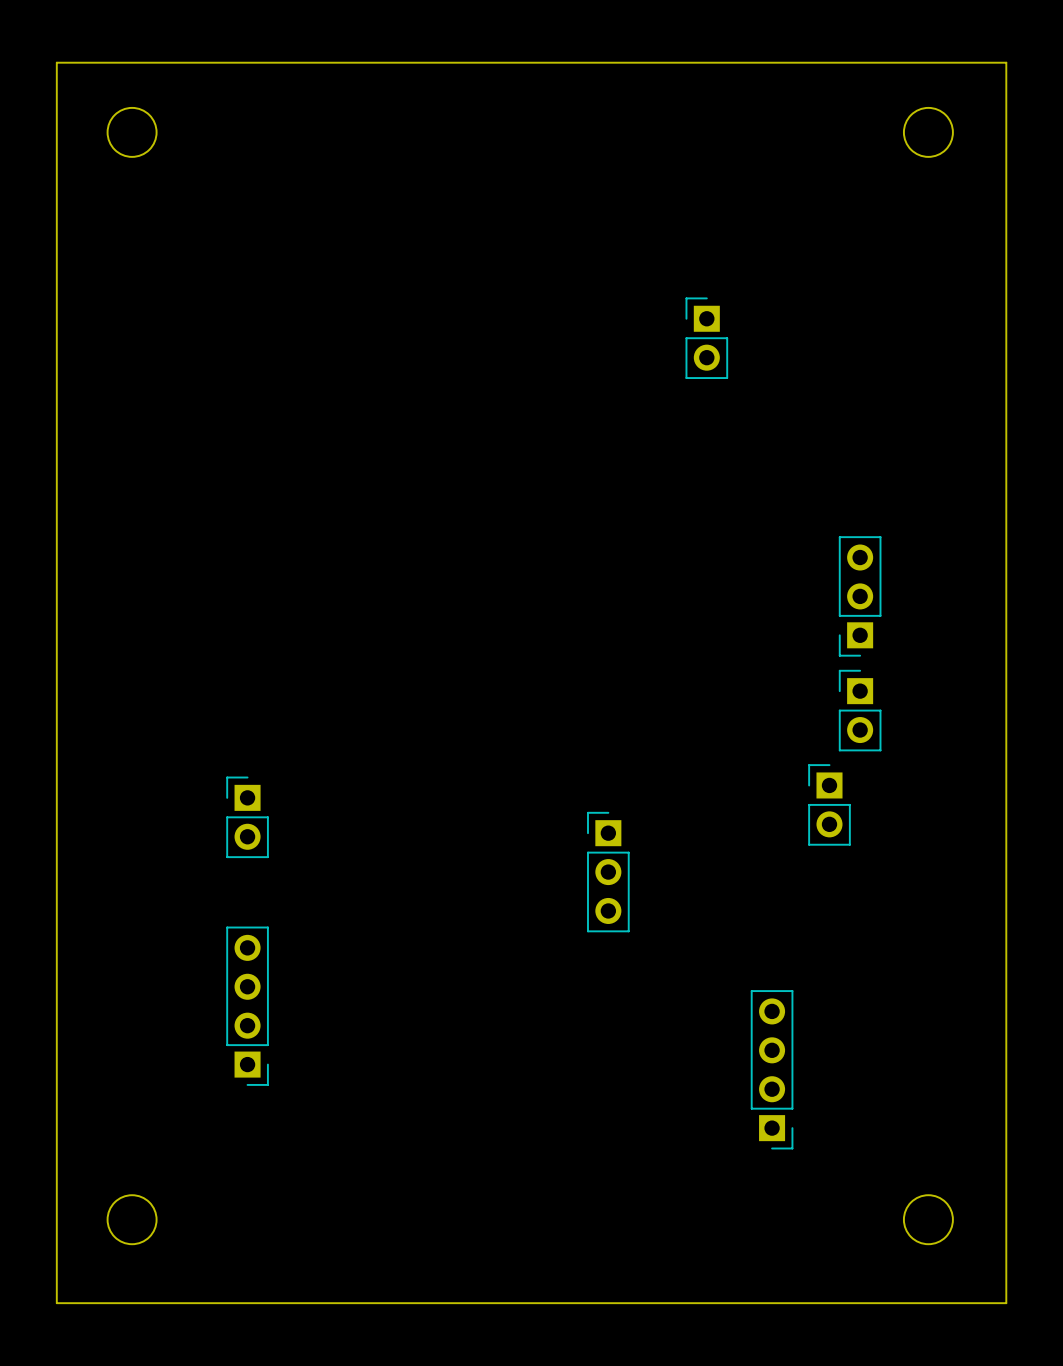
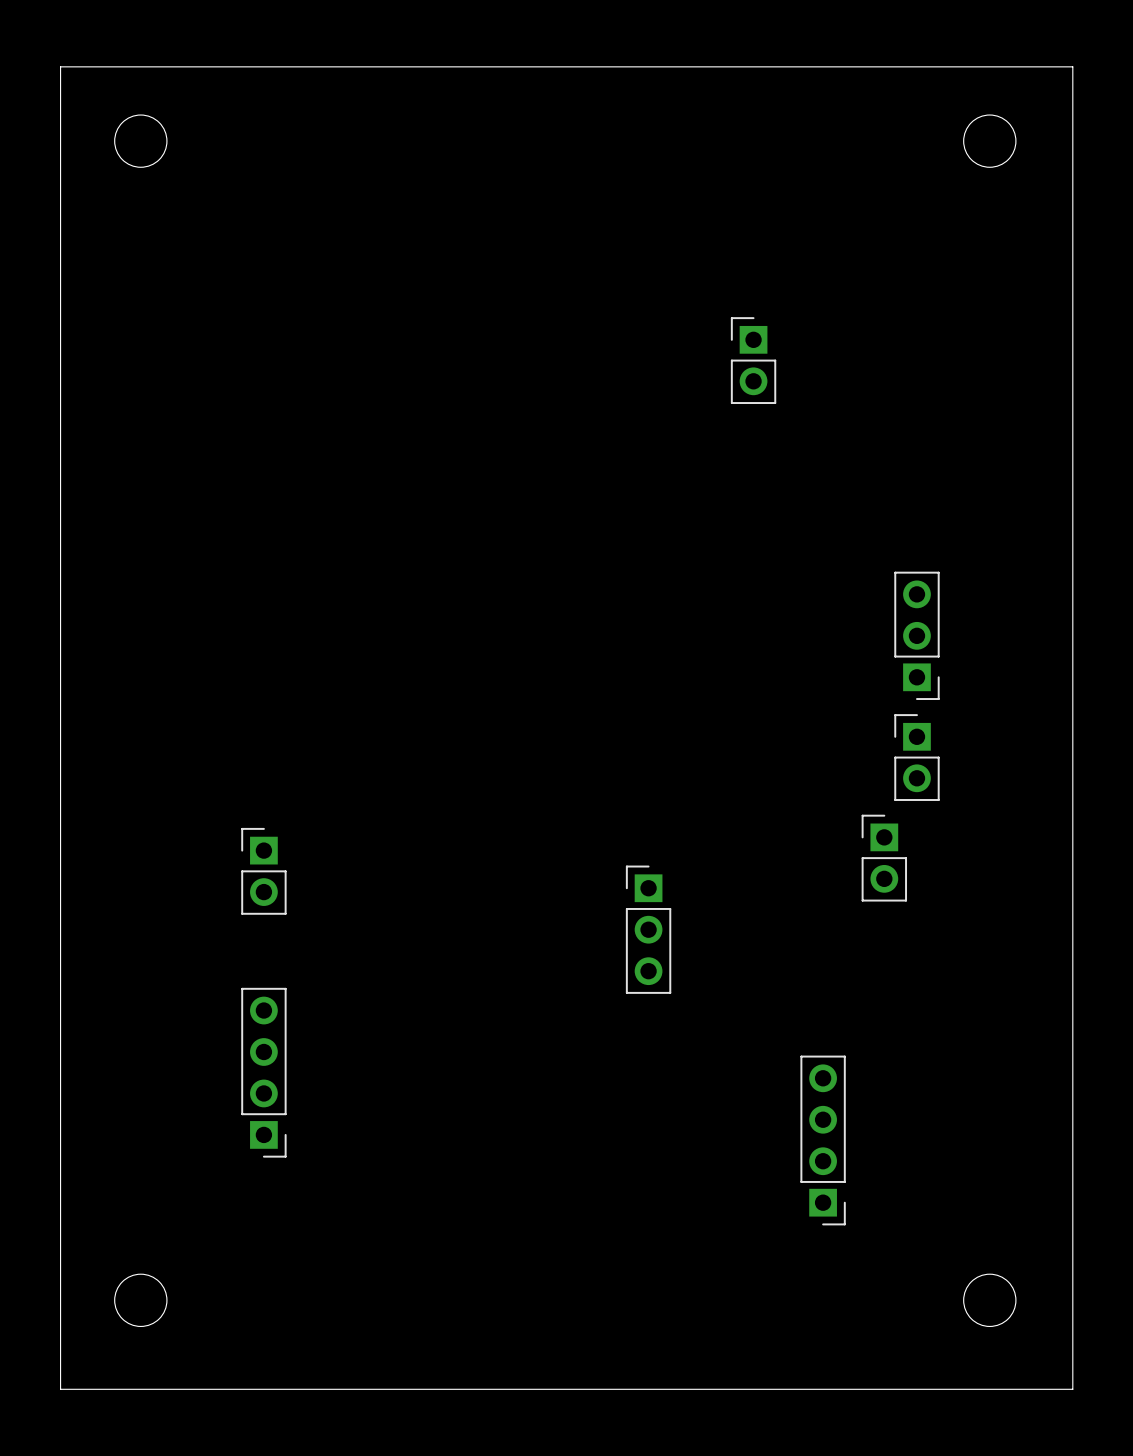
part footprint: [838, 536, 882, 657] -> [894, 571, 940, 701]

